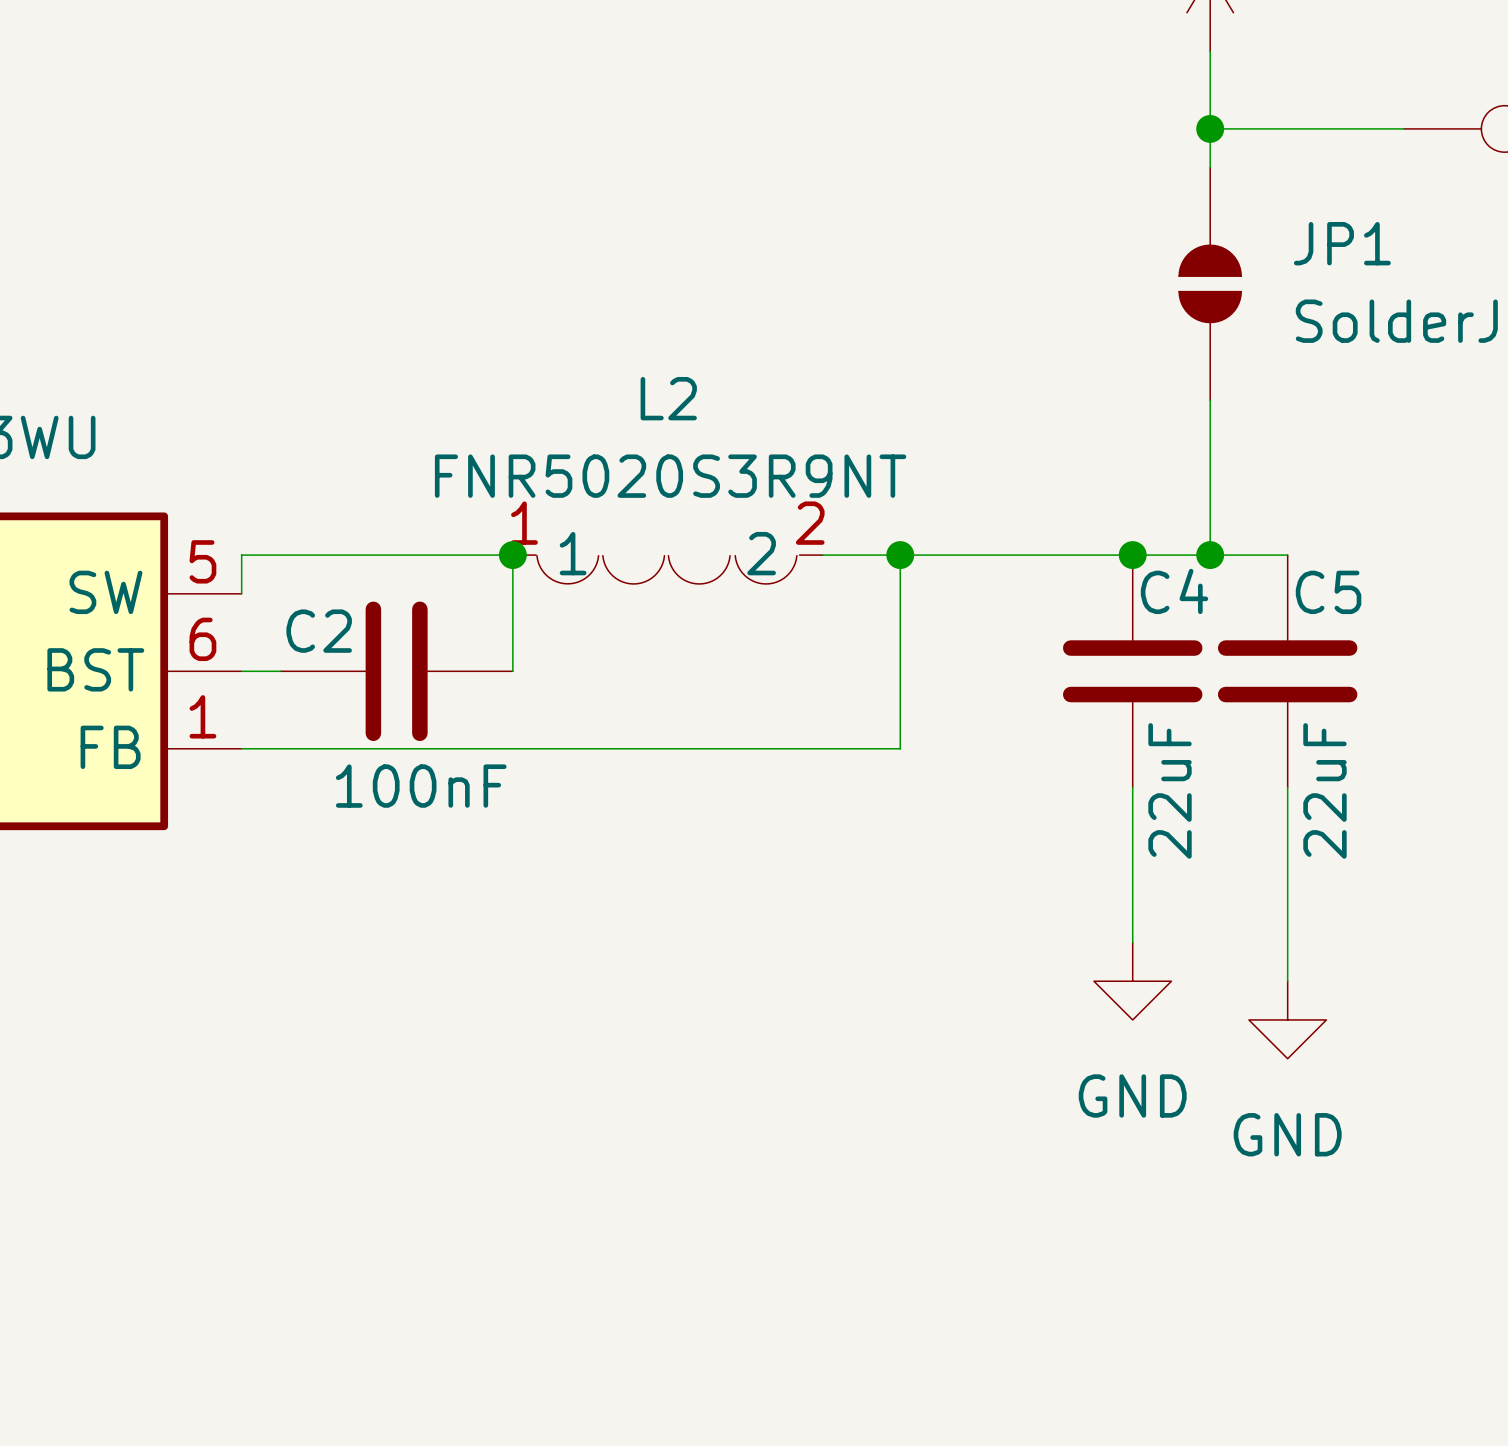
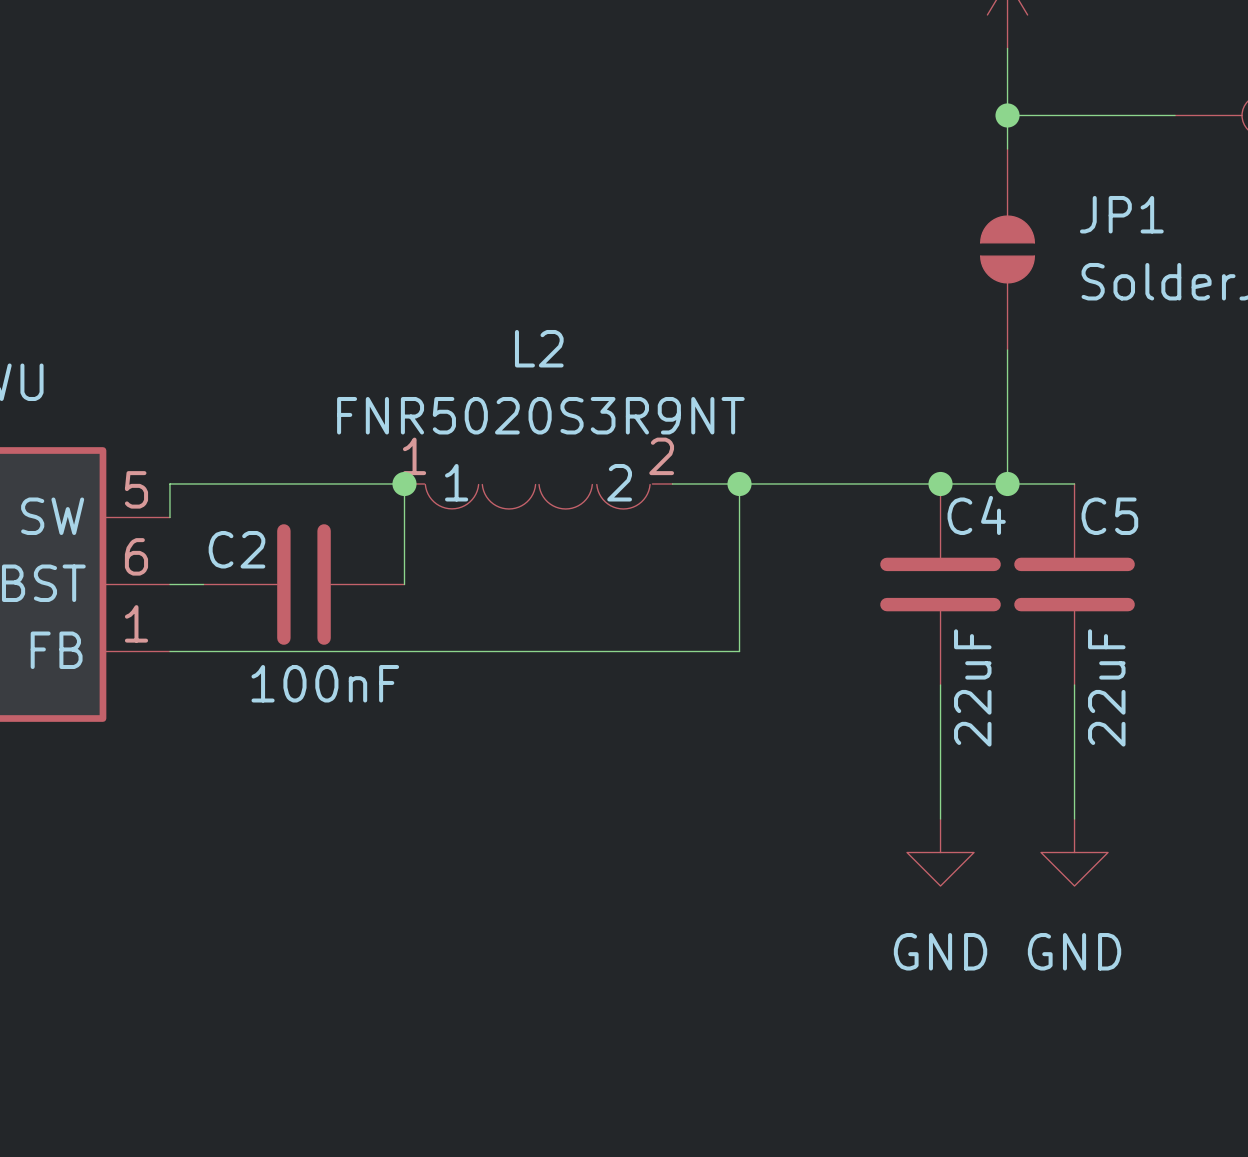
power symbol position: GND (1287, 1019) -> GND (1074, 852)

